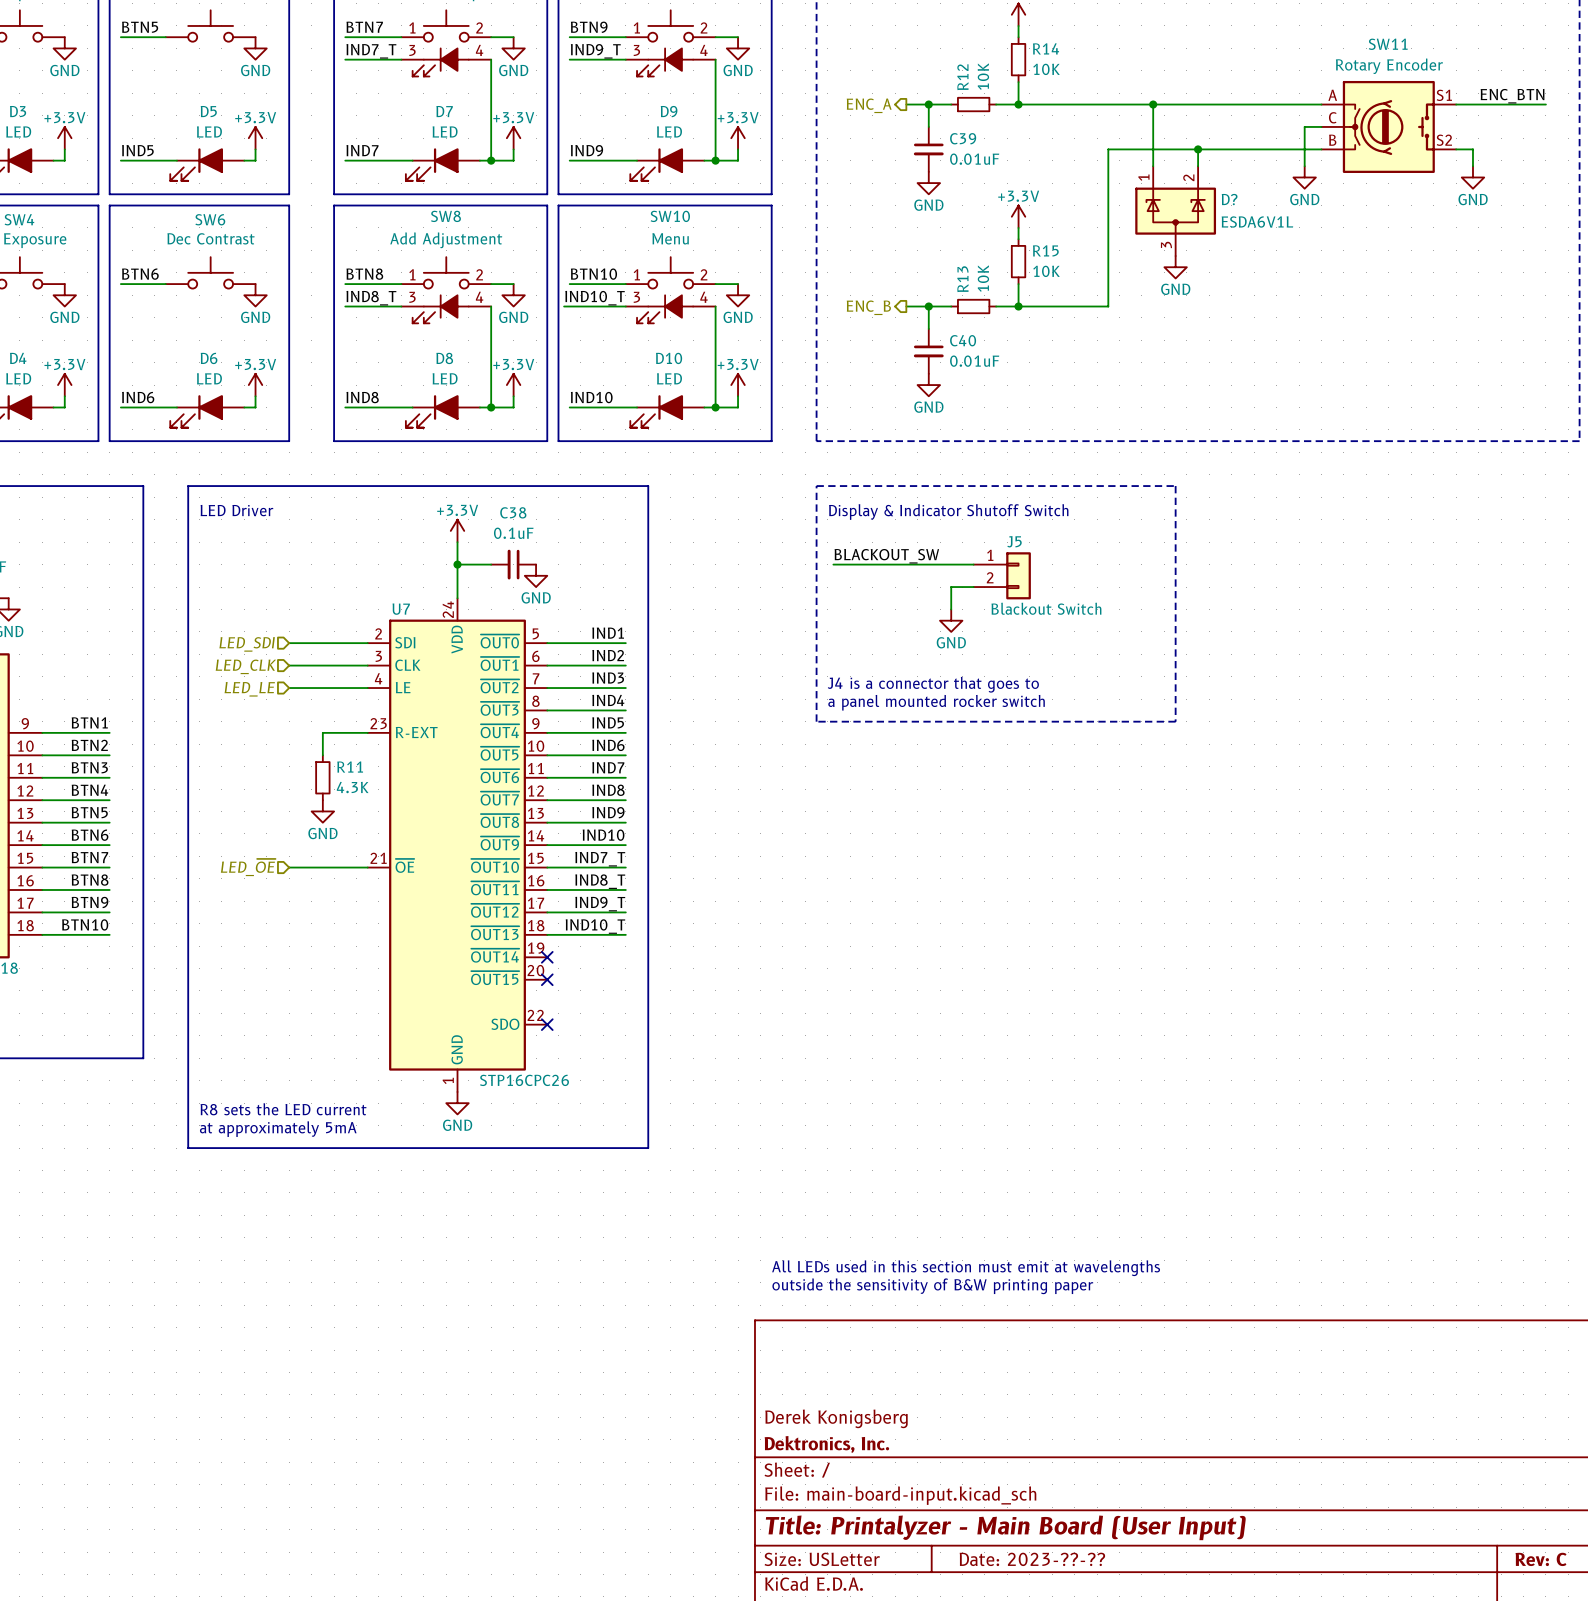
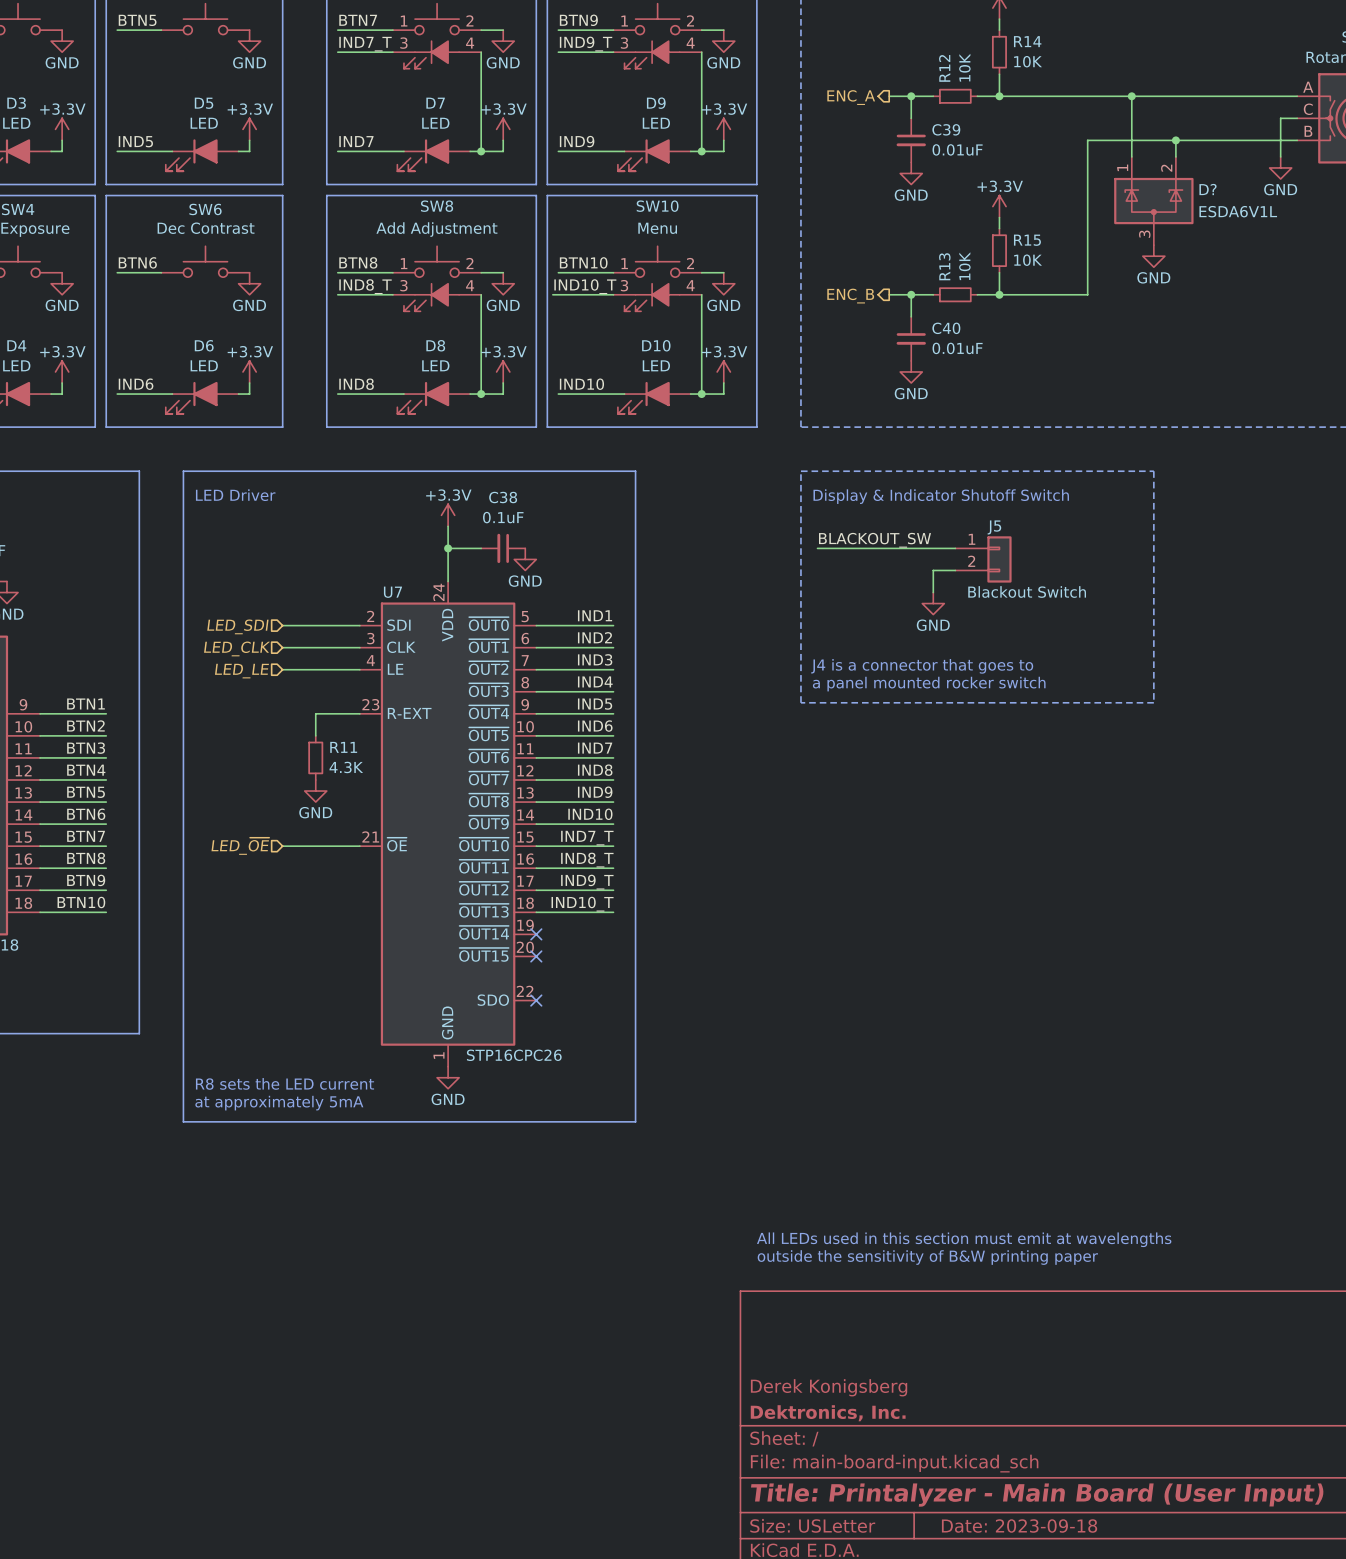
title block: Date: 2023-??-?? (1032, 1559) -> Date: 2023-09-18 (1019, 1526)

